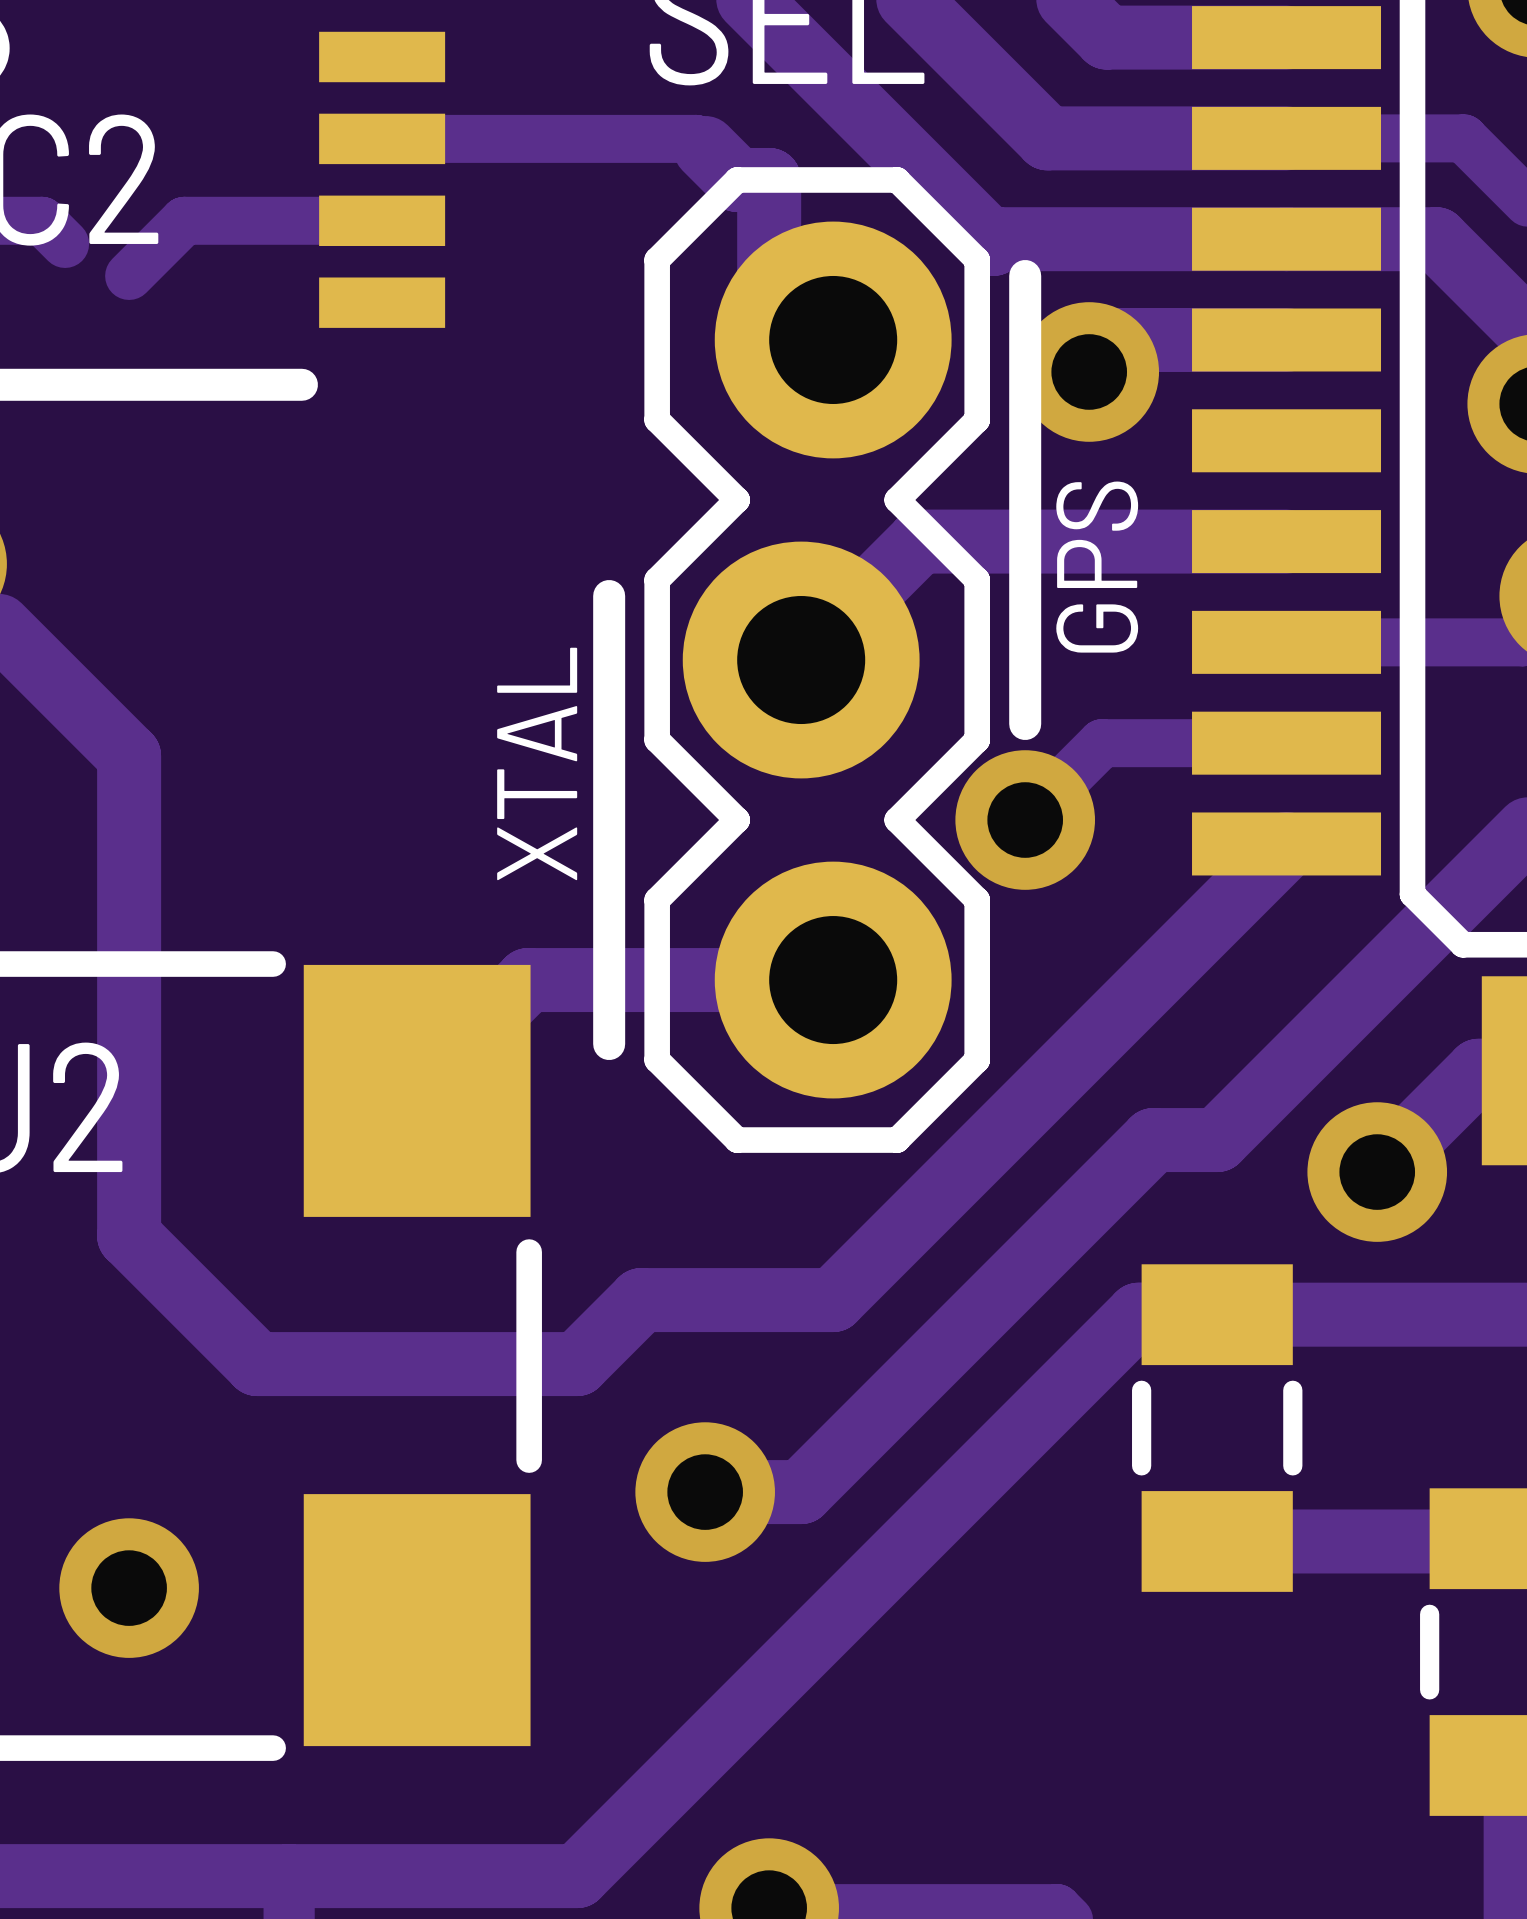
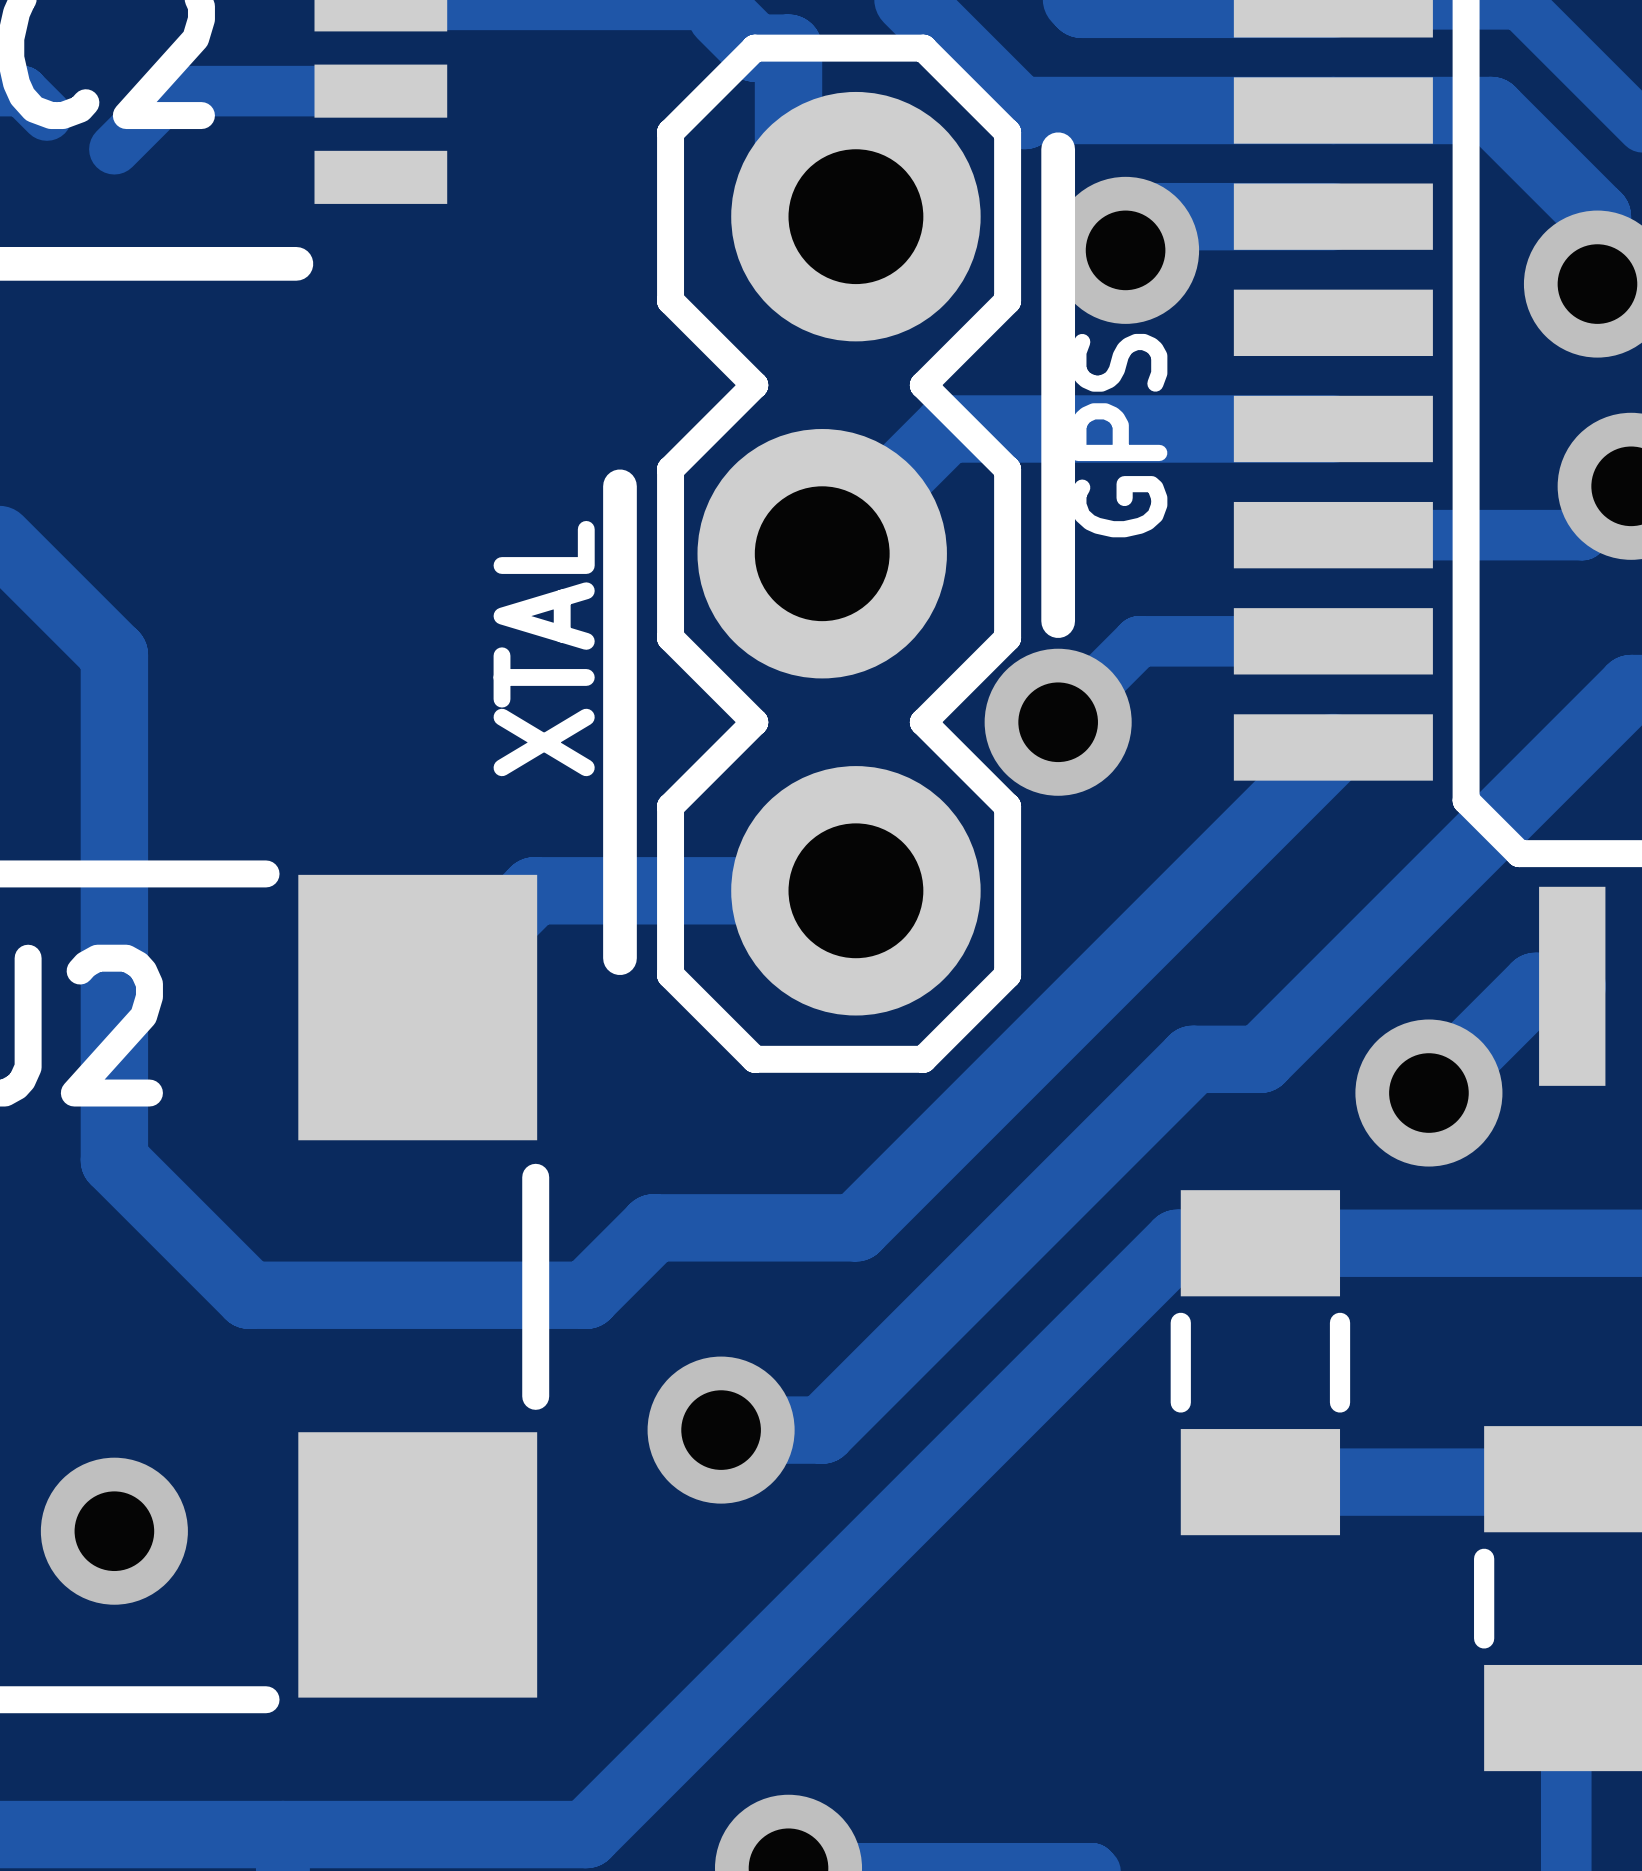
text position: GPS (1097, 567) -> GPS (1118, 435)

